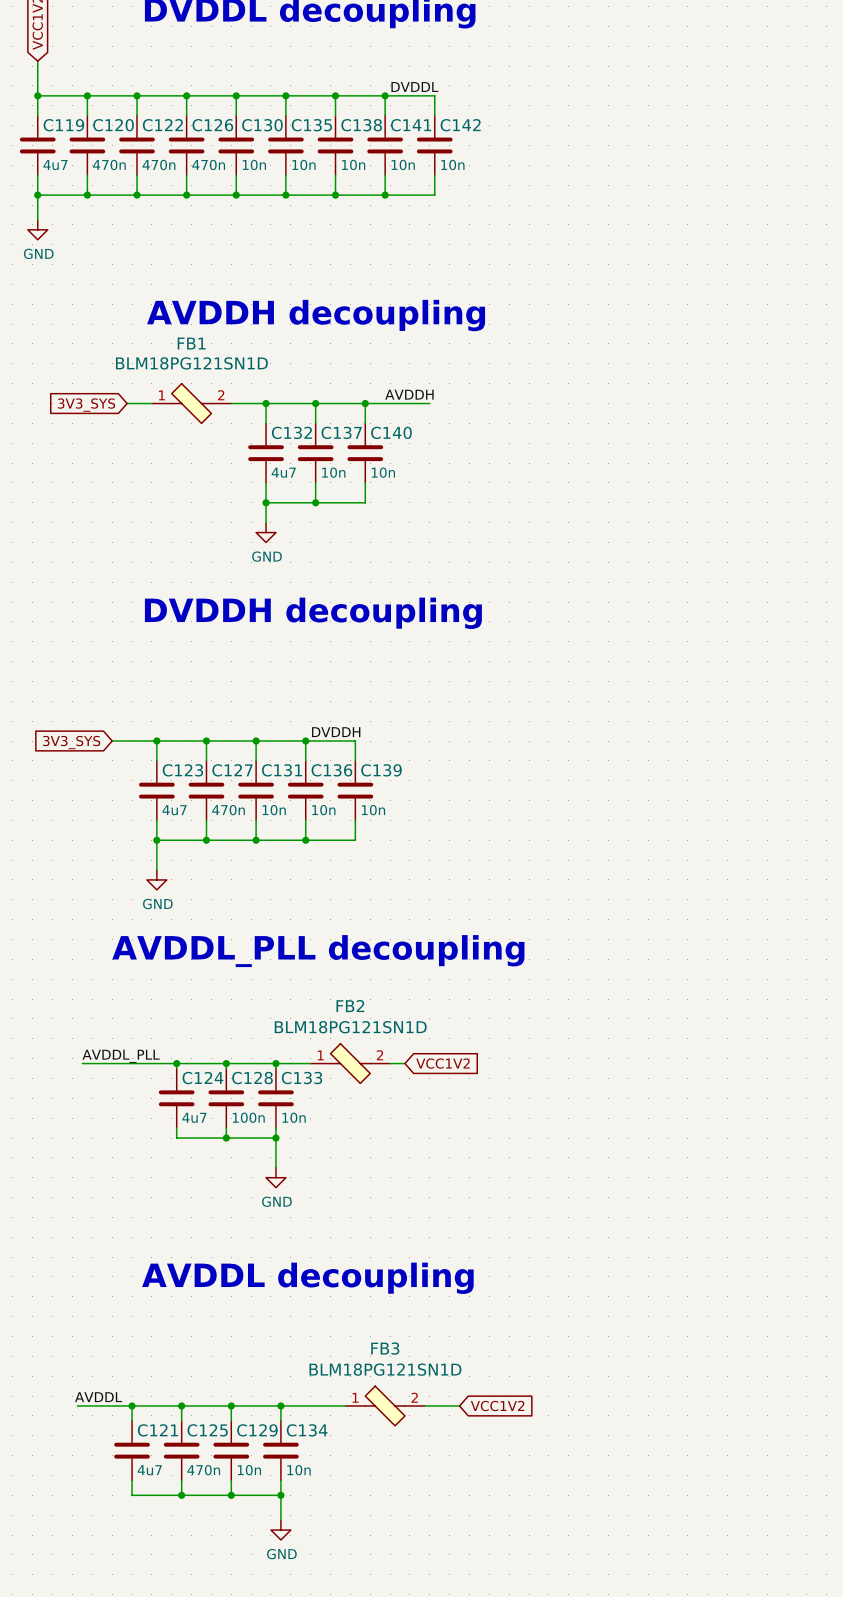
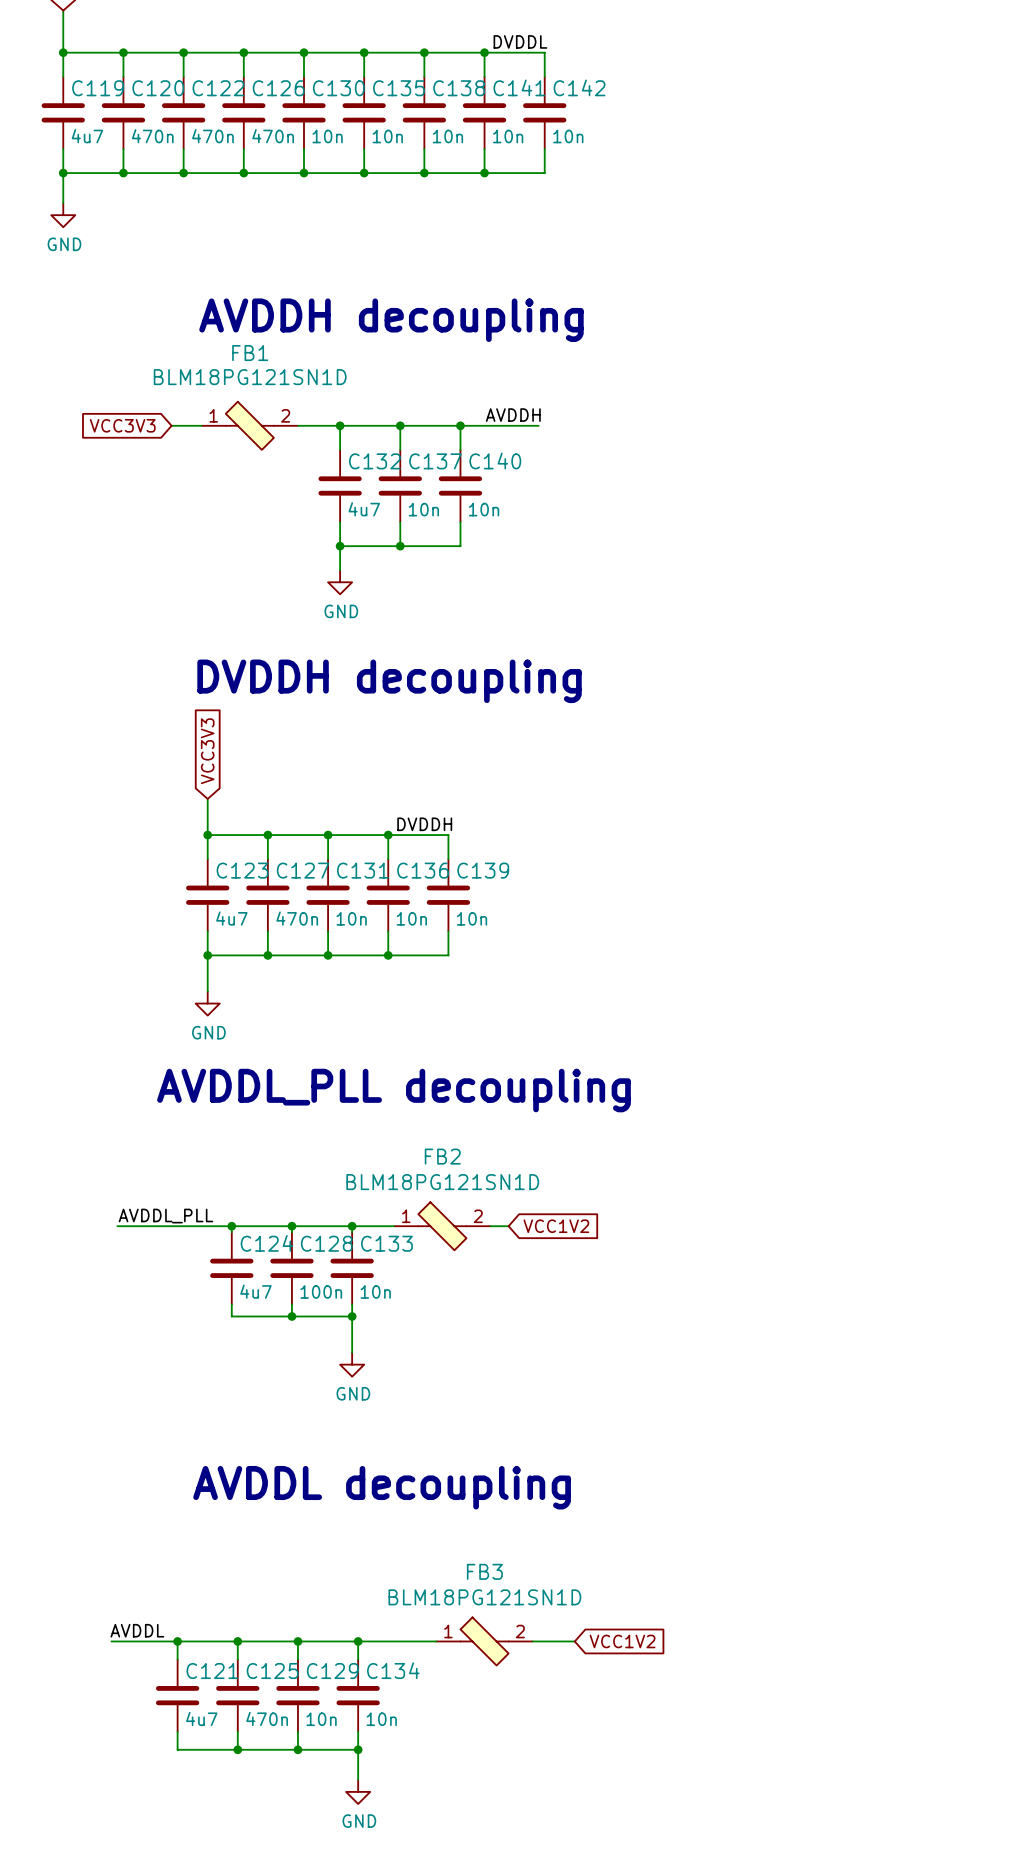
global label: 3V3_SYS (86, 405) -> VCC3V3 (122, 425)
global label: none -> VCC3V3 (207, 751)
wire: (112, 741) (156, 741) -> (207, 798) (207, 835)
global label: 3V3_SYS (71, 742) -> none

